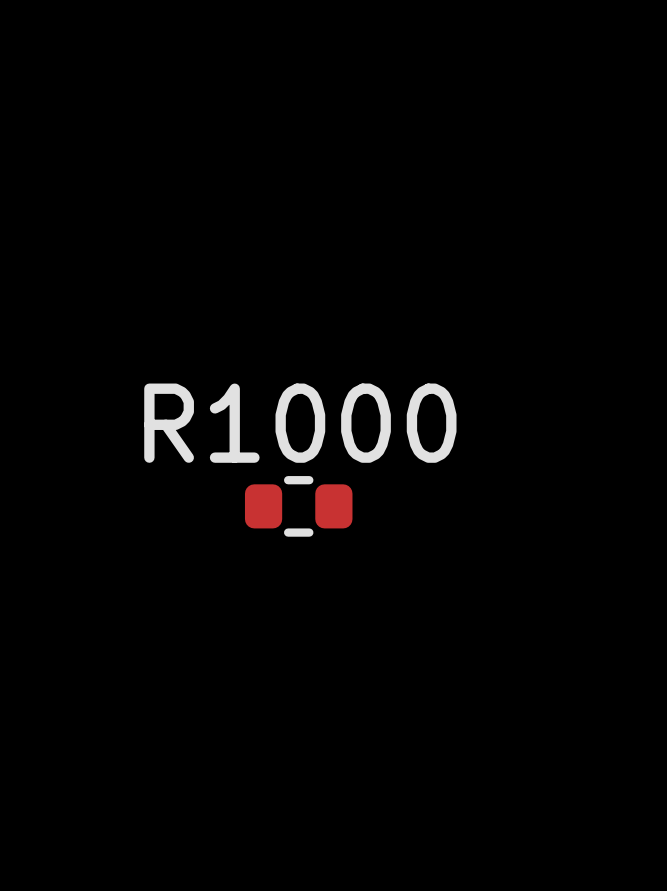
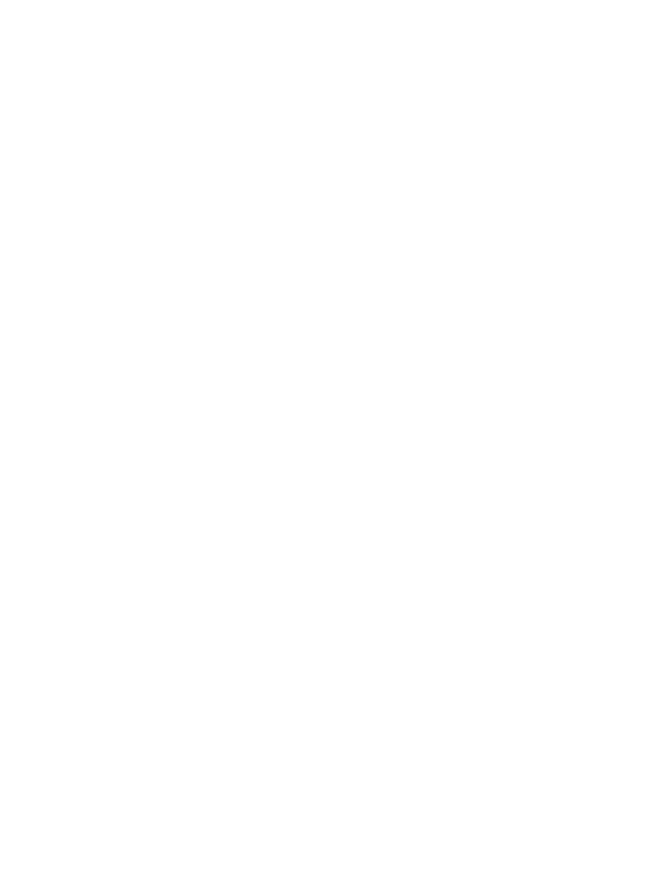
R1000: (298, 506) -> none

